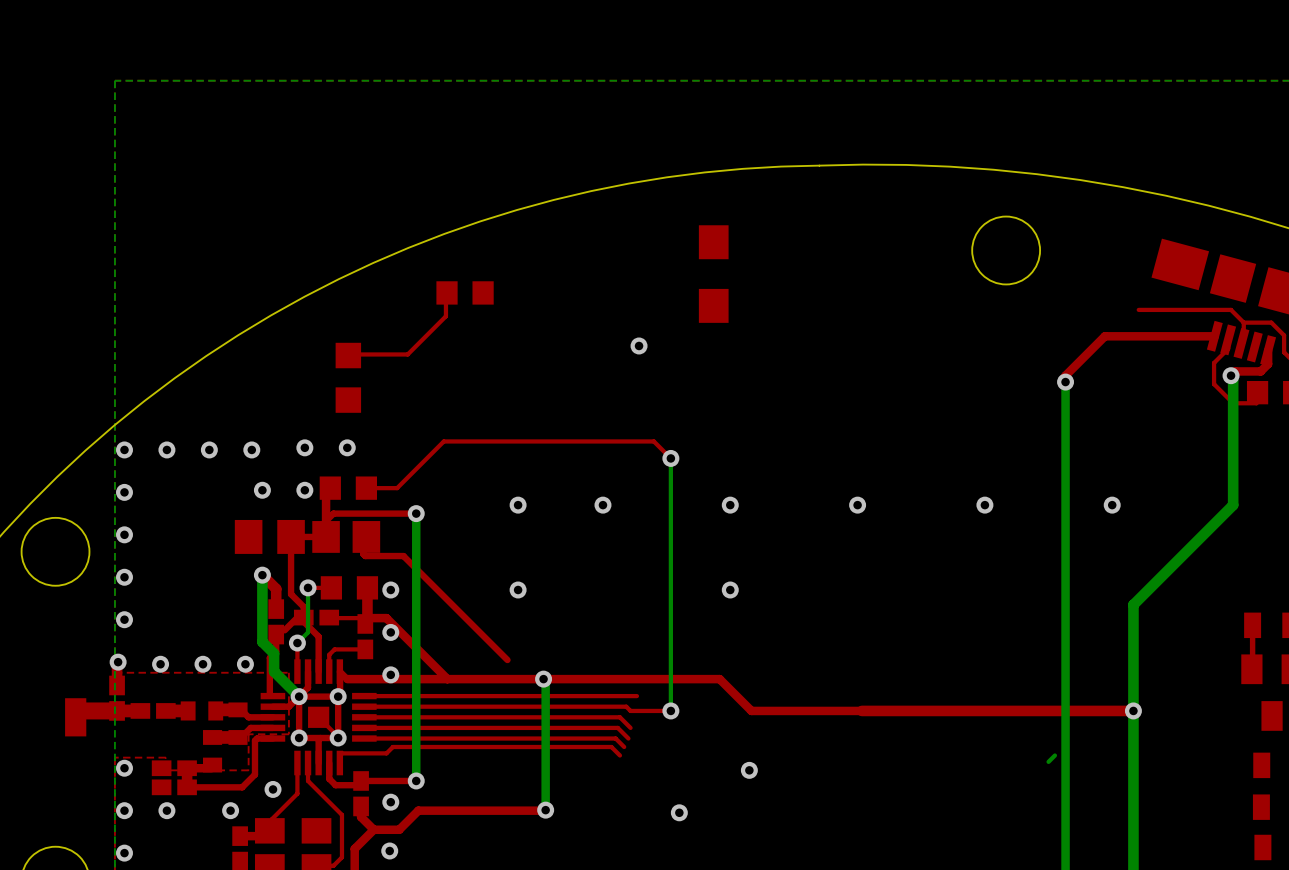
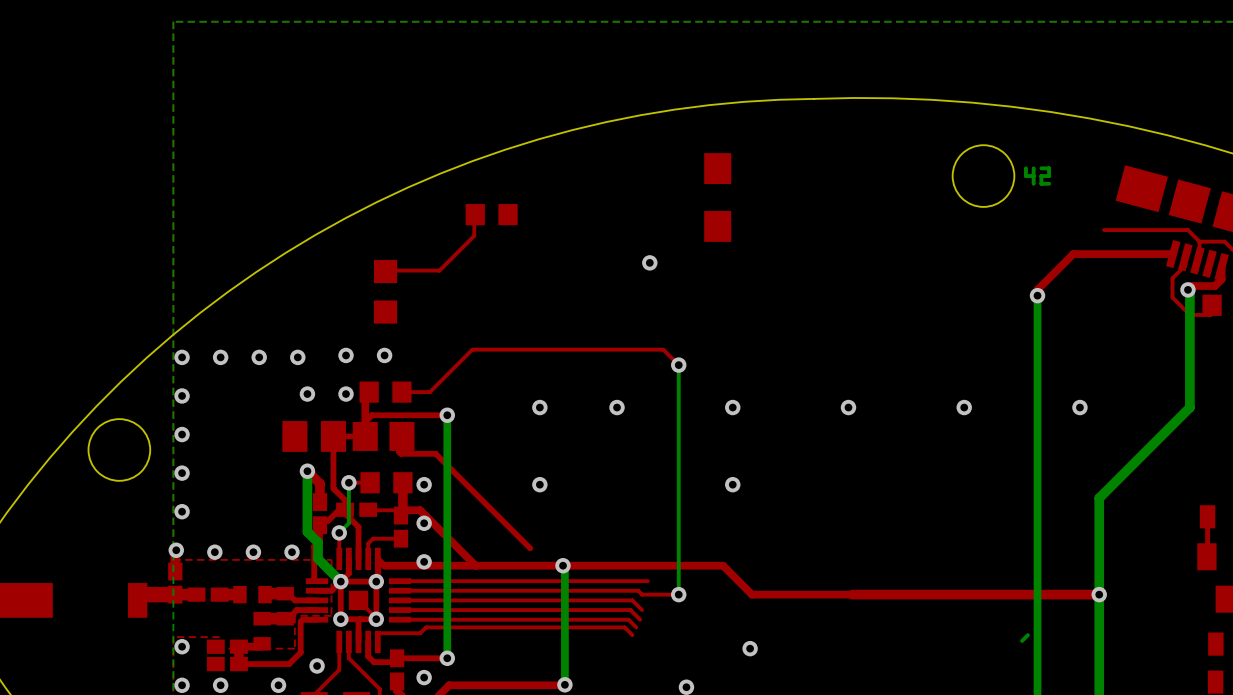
bottom track: none -> (1025, 168) (1025, 176) (1033, 176)
bottom track: none -> (1033, 168) (1033, 183)
bottom track: none -> (1041, 168) (1049, 168) (1049, 176) (1041, 176) (1041, 183) (1049, 183)

